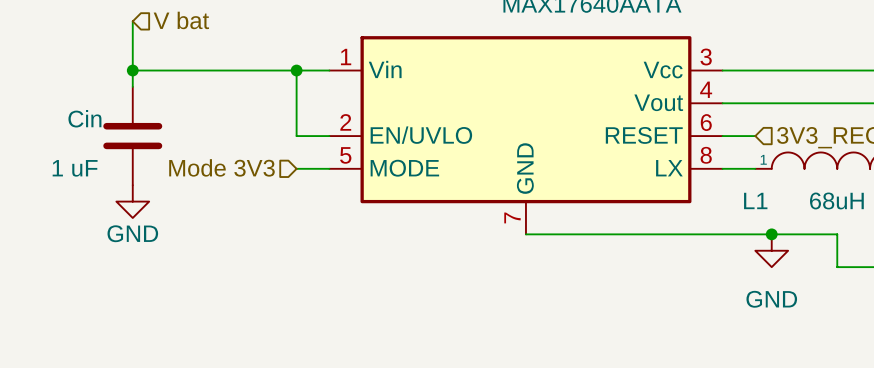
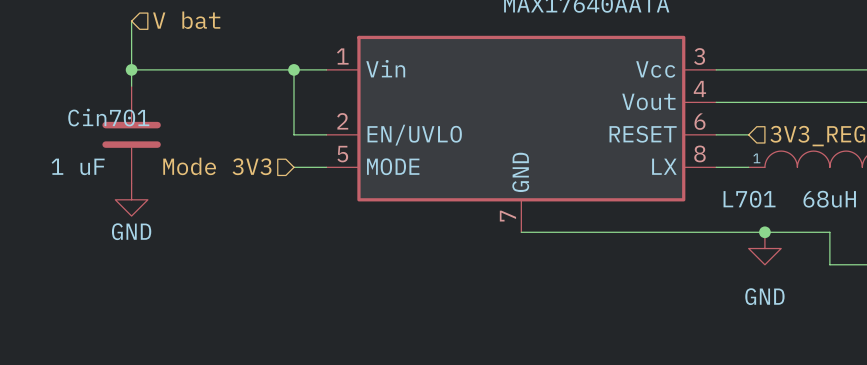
Cin name: Cin (84, 118) -> Cin701 (108, 117)
L1 name: L1 (755, 200) -> L701 (749, 199)

